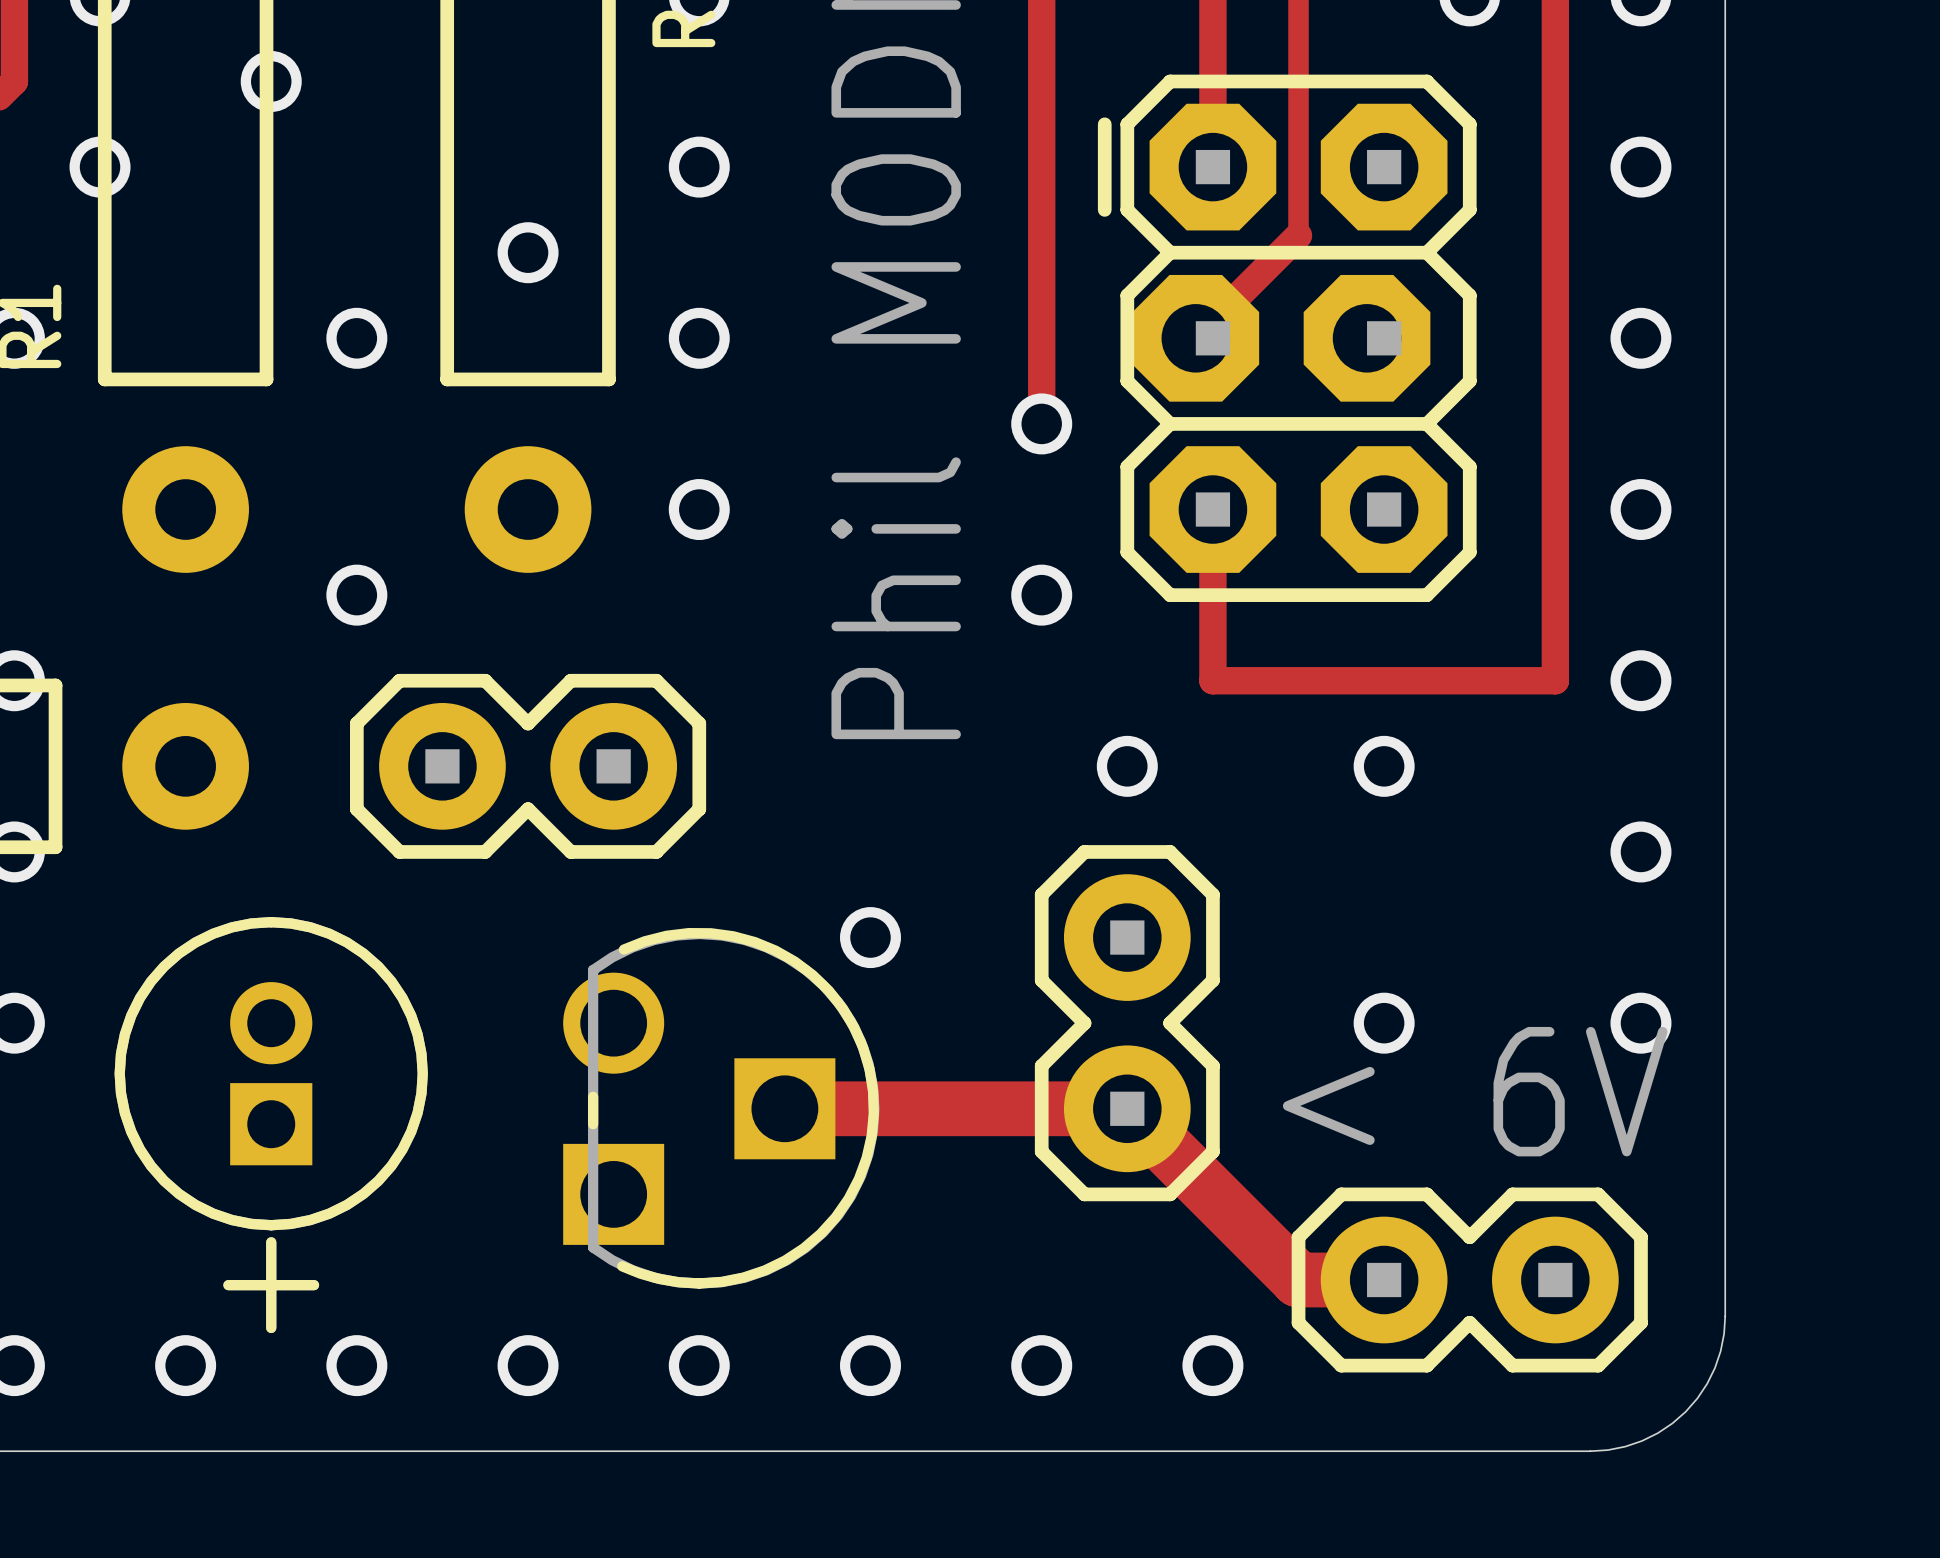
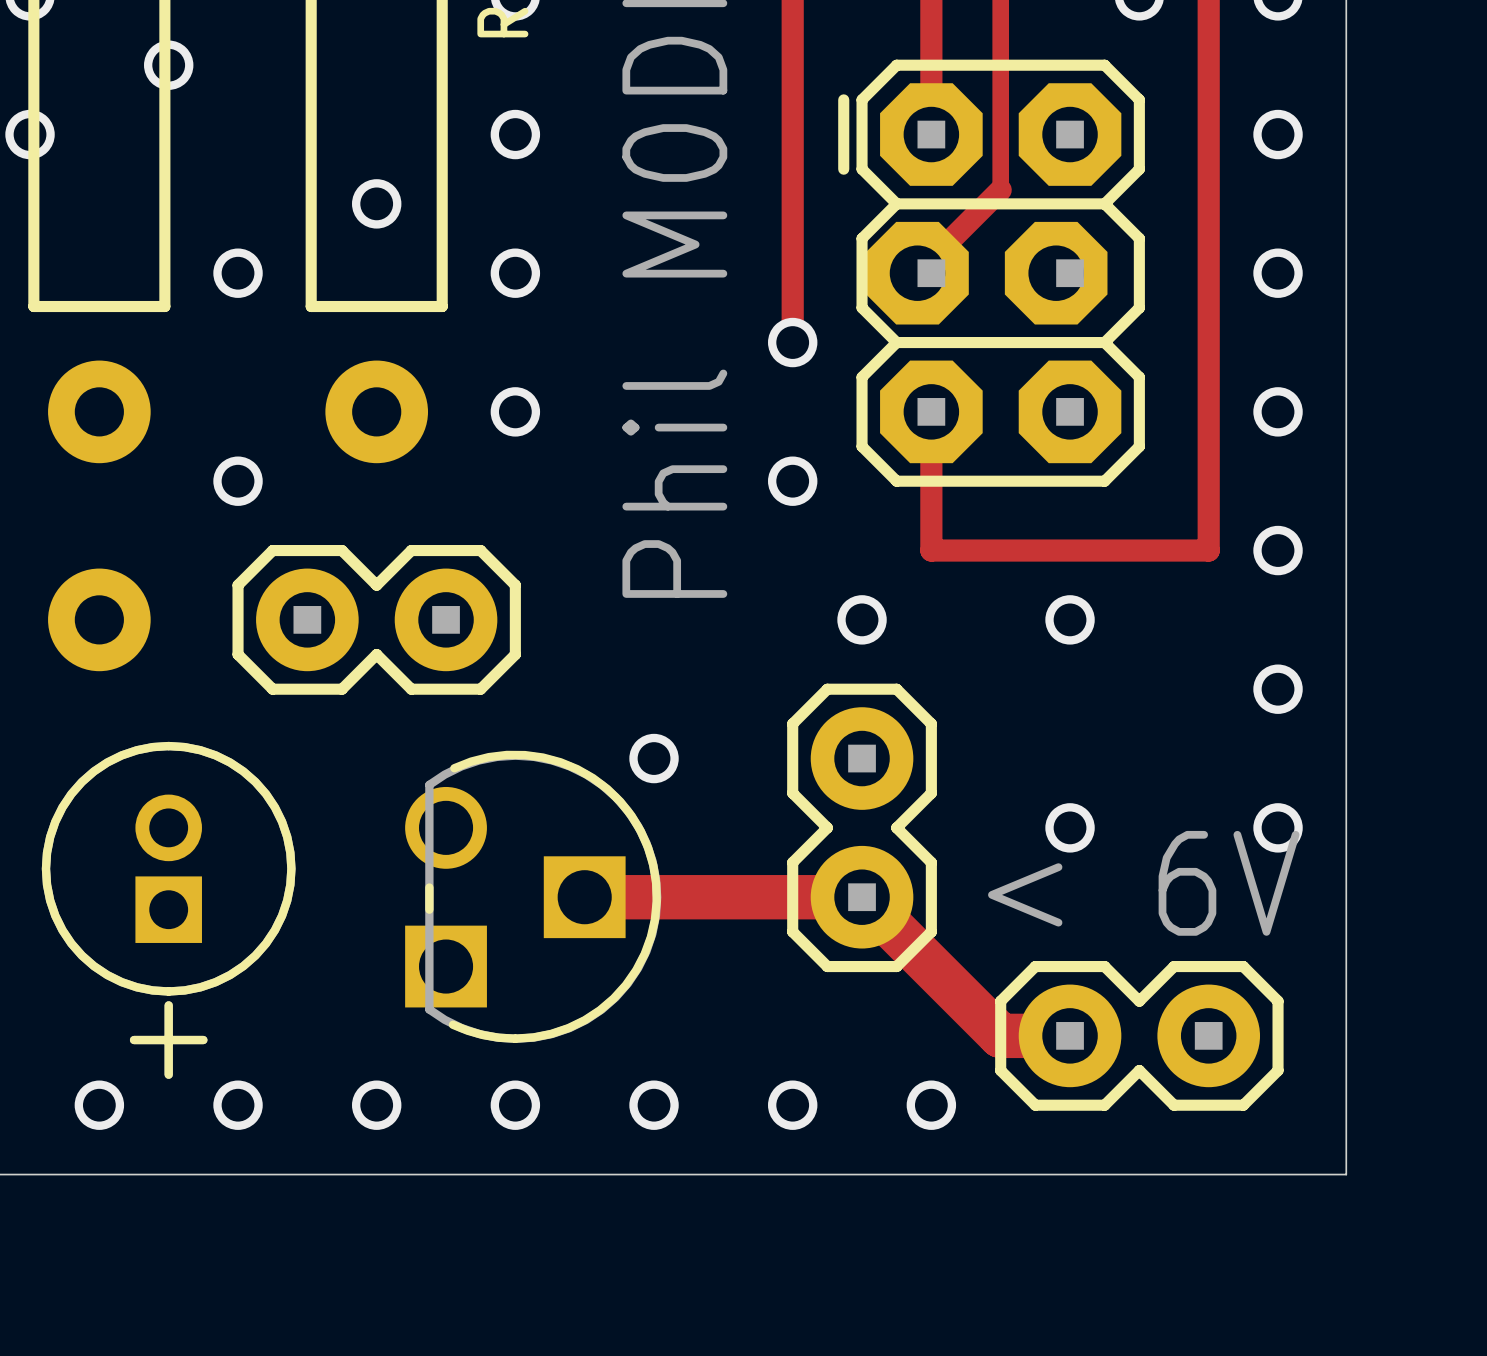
board edge: (1725, 1316) (1720, 1351) (1714, 1367) (1707, 1383) (1685, 1411) (1657, 1433) (1642, 1440) (1625, 1446) (1590, 1451) -> (1346, 1065) (1346, 1174) (1237, 1174)

